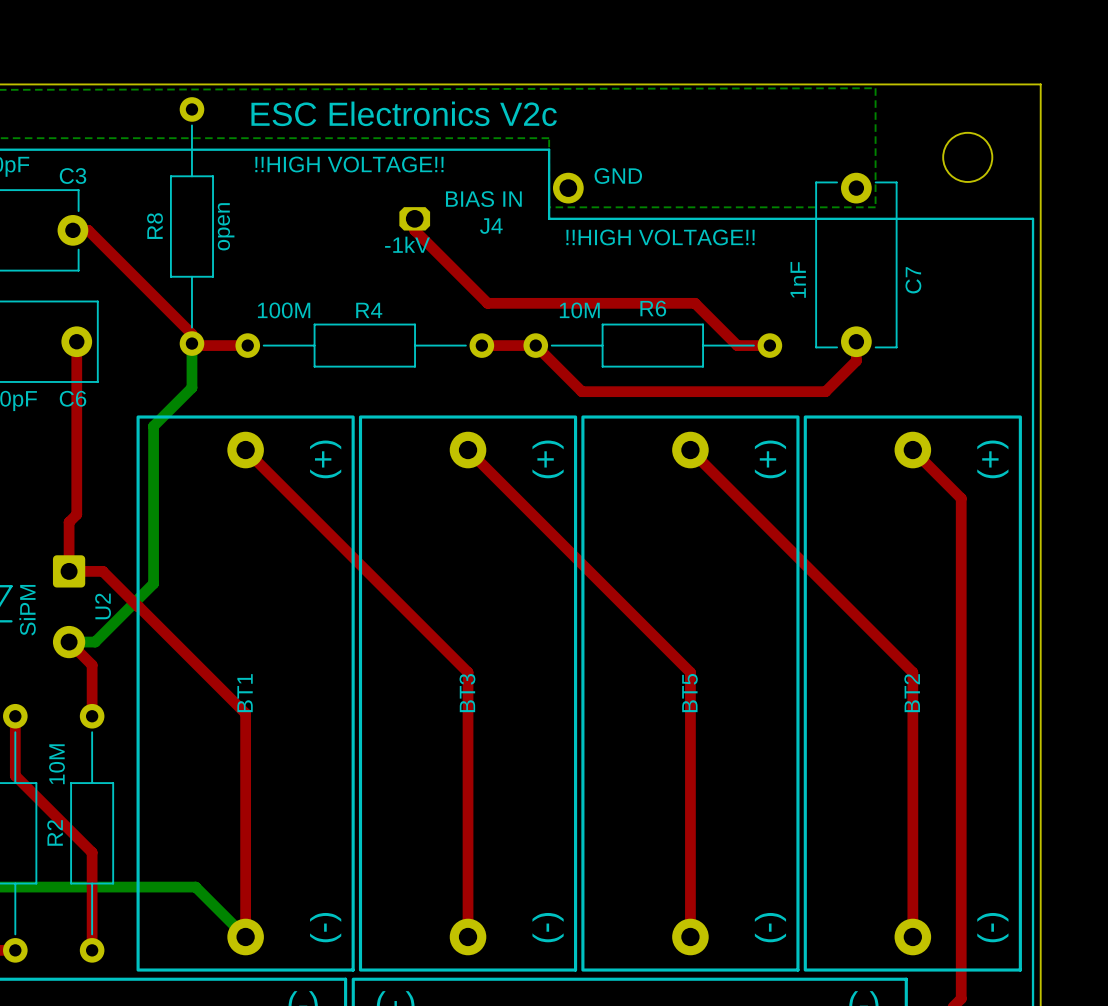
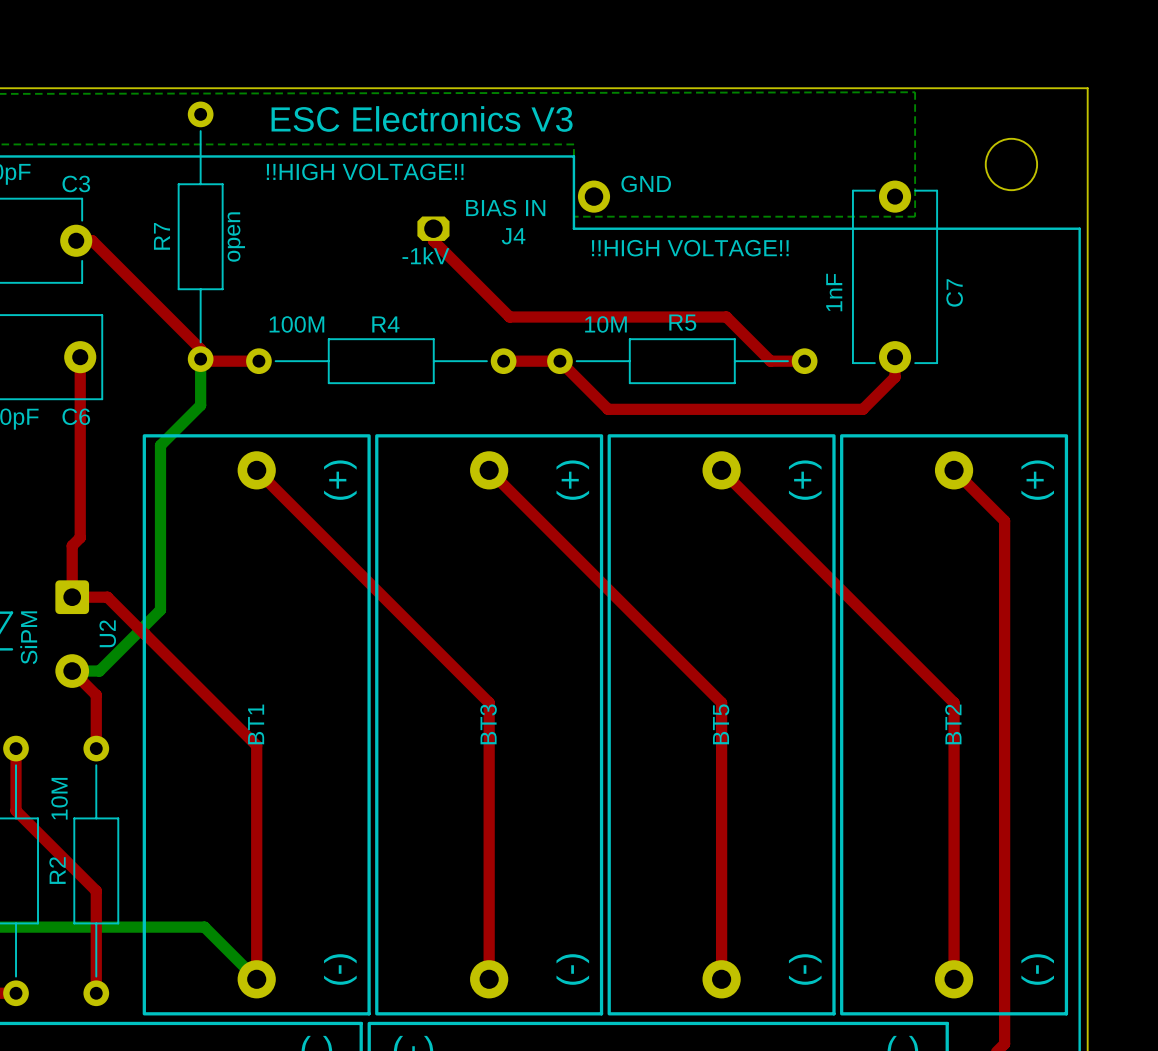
text: ESC Electronics V2c (404, 113) -> ESC Electronics V3 (422, 118)
R8 name: R8 (154, 226) -> R7 (161, 236)
R6 name: R6 (653, 308) -> R5 (682, 322)

